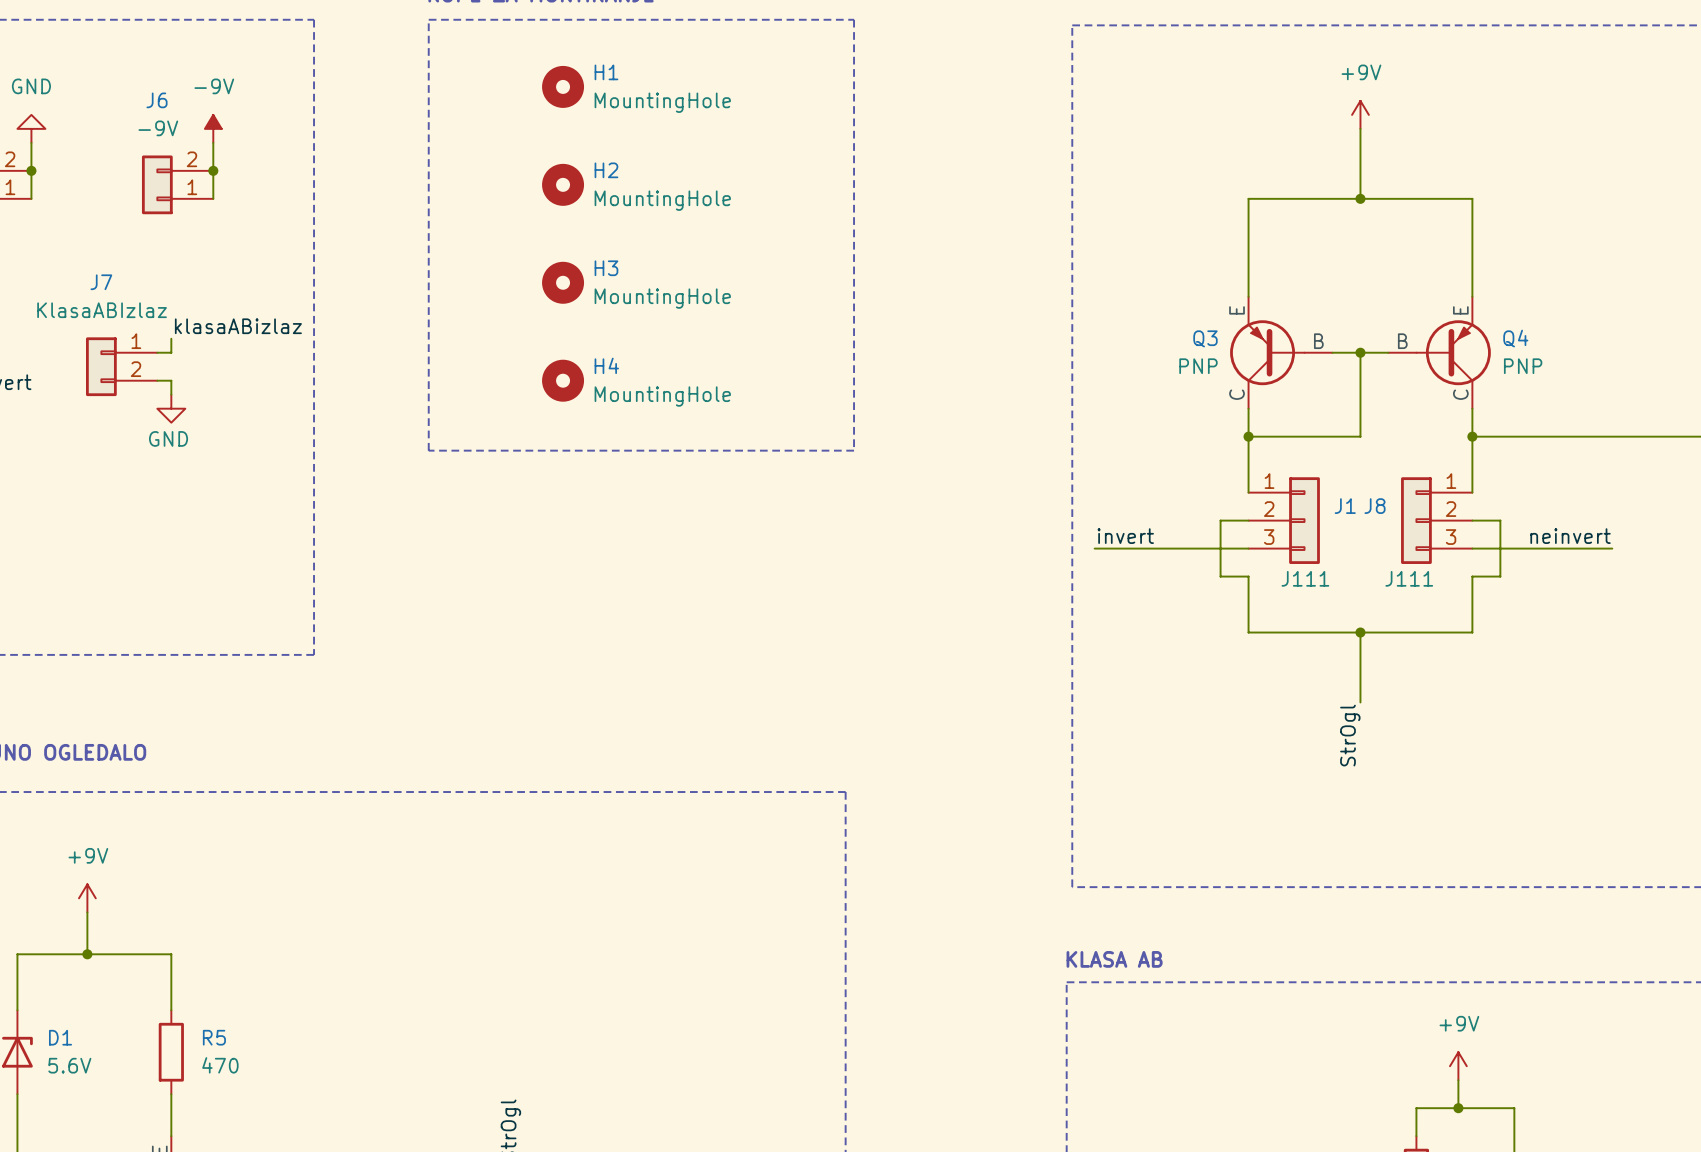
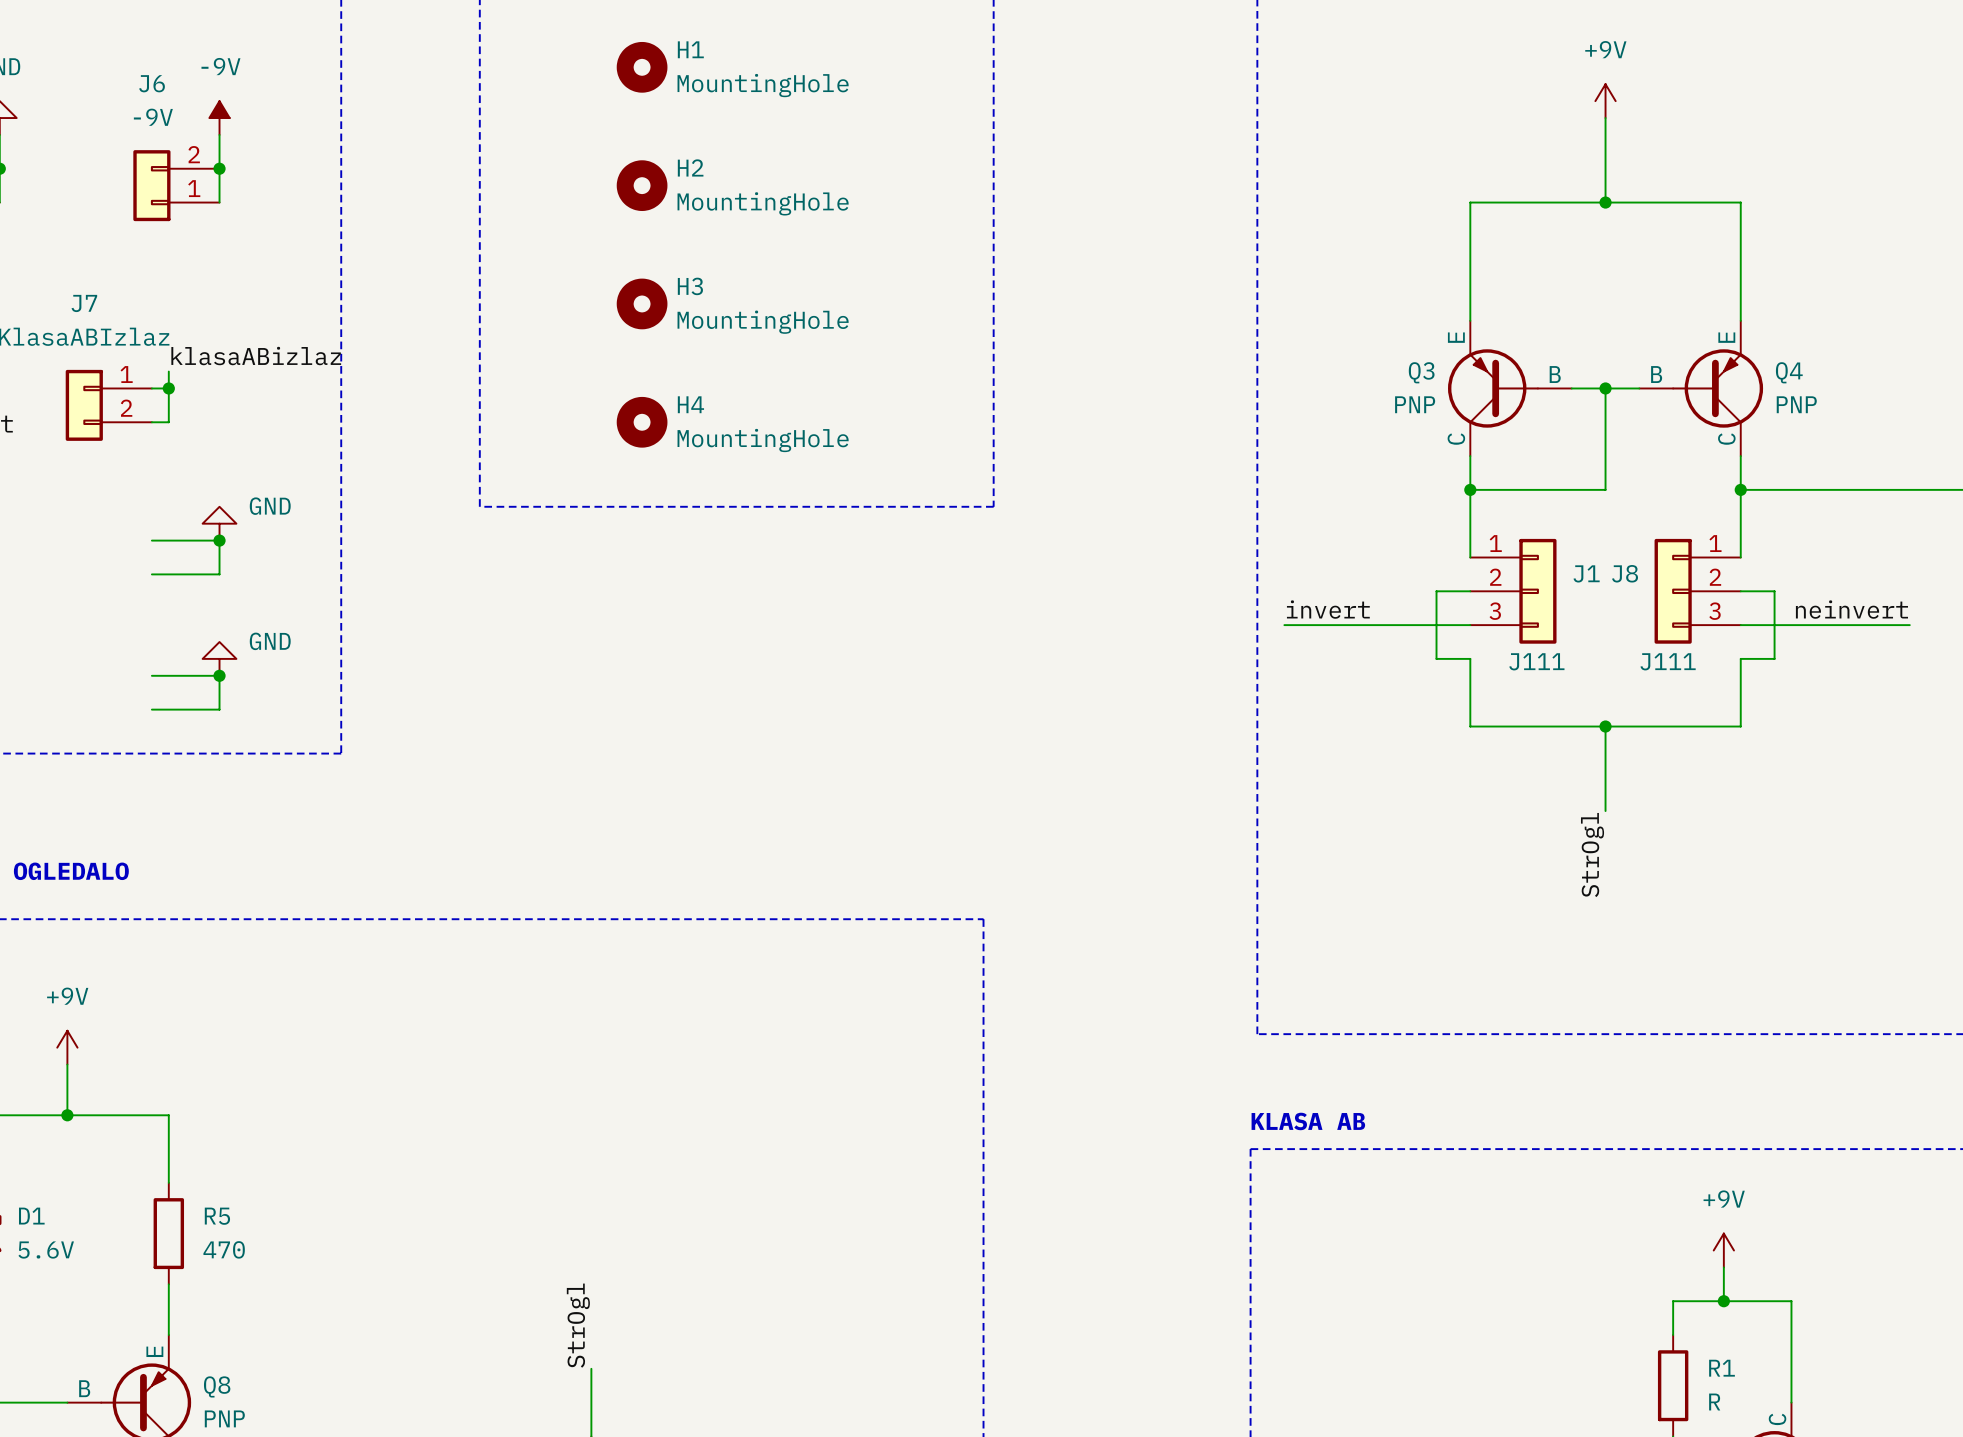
junction: none -> (168, 388)
wire: (171, 380) (171, 394) -> (168, 422) (168, 388)
power symbol rotation: 0° (171, 408) -> 180° (219, 523)
power symbol position: GND (171, 408) -> GND (219, 523)
power symbol text position: GND (168, 438) -> GND (270, 506)
wire: none -> (151, 540) (219, 540) (219, 574) (151, 574)
junction: none -> (219, 540)
power symbol: none -> GND (219, 658)
wire: none -> (151, 675) (219, 675) (219, 709) (151, 709)
junction: none -> (219, 675)

